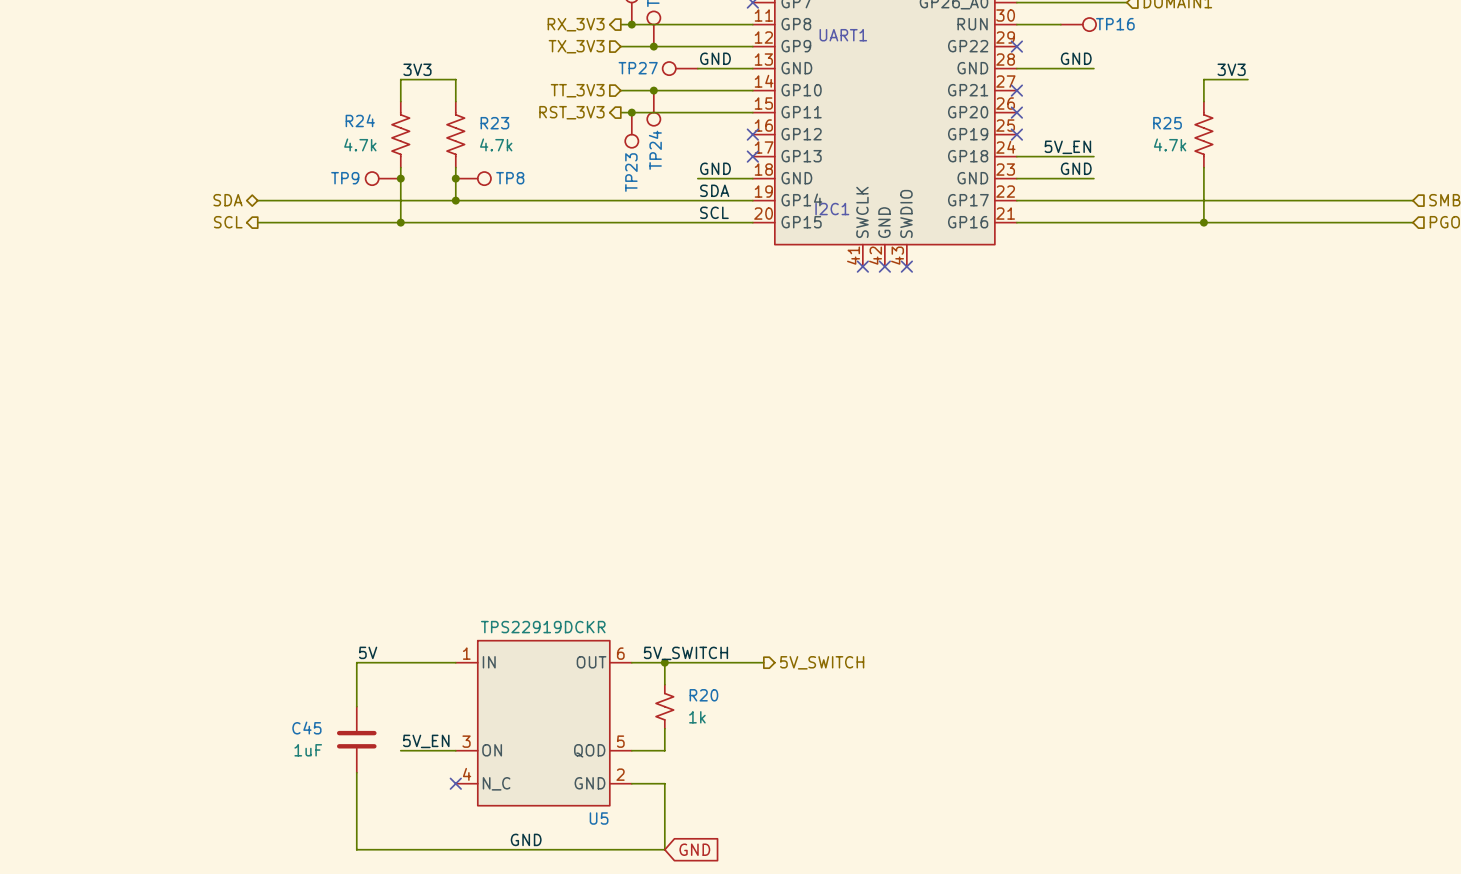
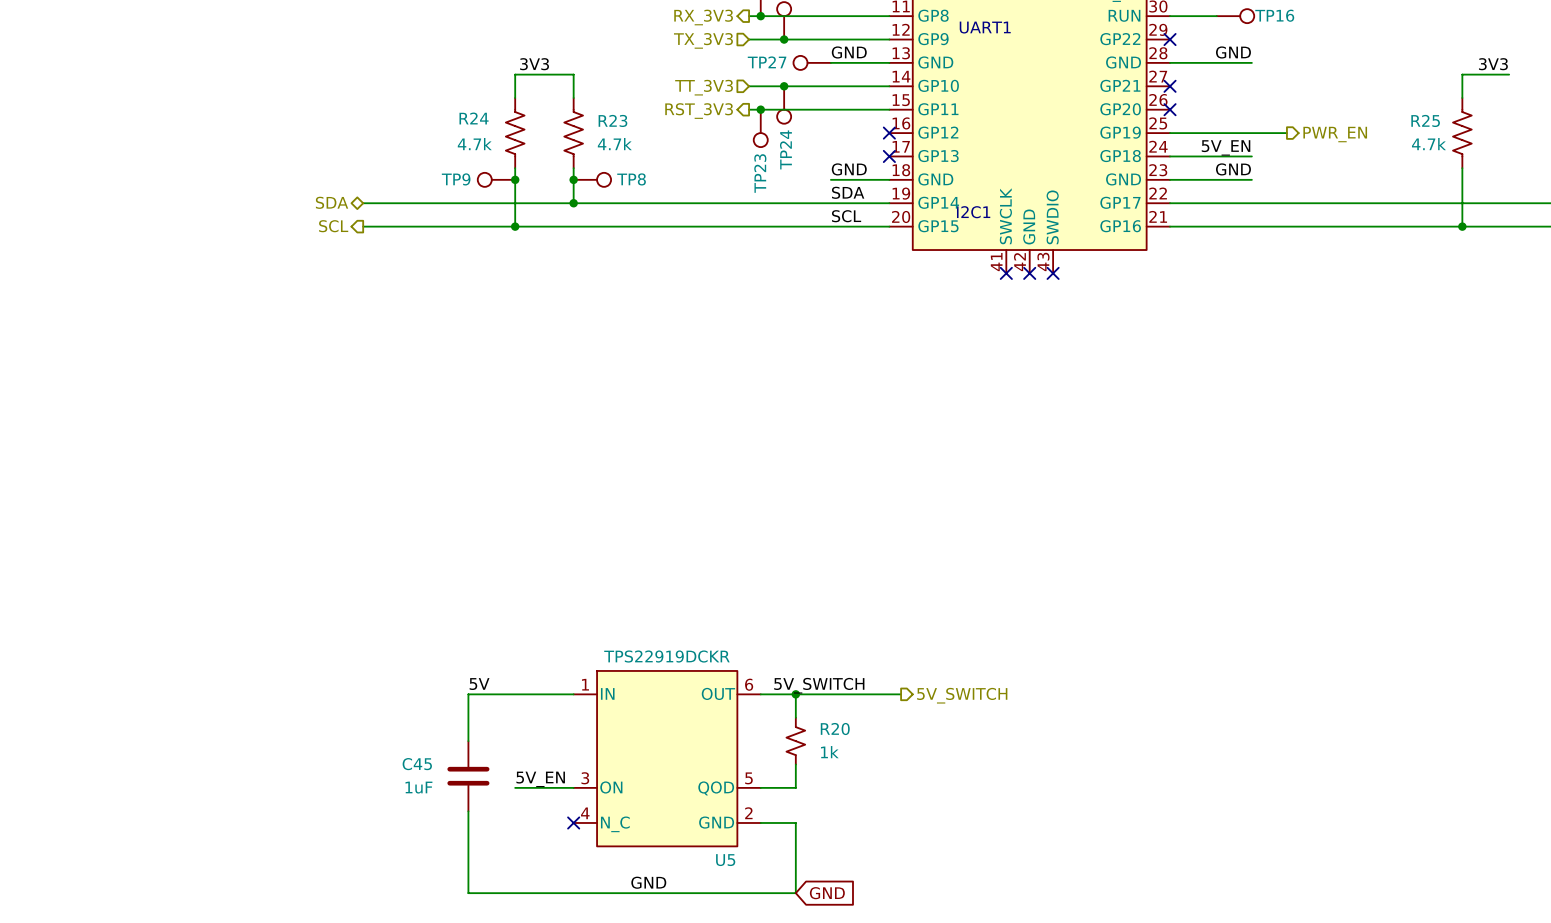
label position: 3V3 (1231, 69) -> 3V3 (1493, 64)
wire: (1247, 79) (1203, 79) (1203, 101) -> (1509, 74) (1462, 74) (1462, 98)
wire: none -> (1170, 133) (1286, 133)
no-connect mark: (1016, 134) -> none
hierarchical label: none -> PWR_EN (1335, 134)
R25 position: (1203, 134) -> (1462, 133)
wire: (1203, 167) (1203, 222) -> (1462, 168) (1462, 226)
junction: (1203, 222) -> none
junction: none -> (1462, 226)

